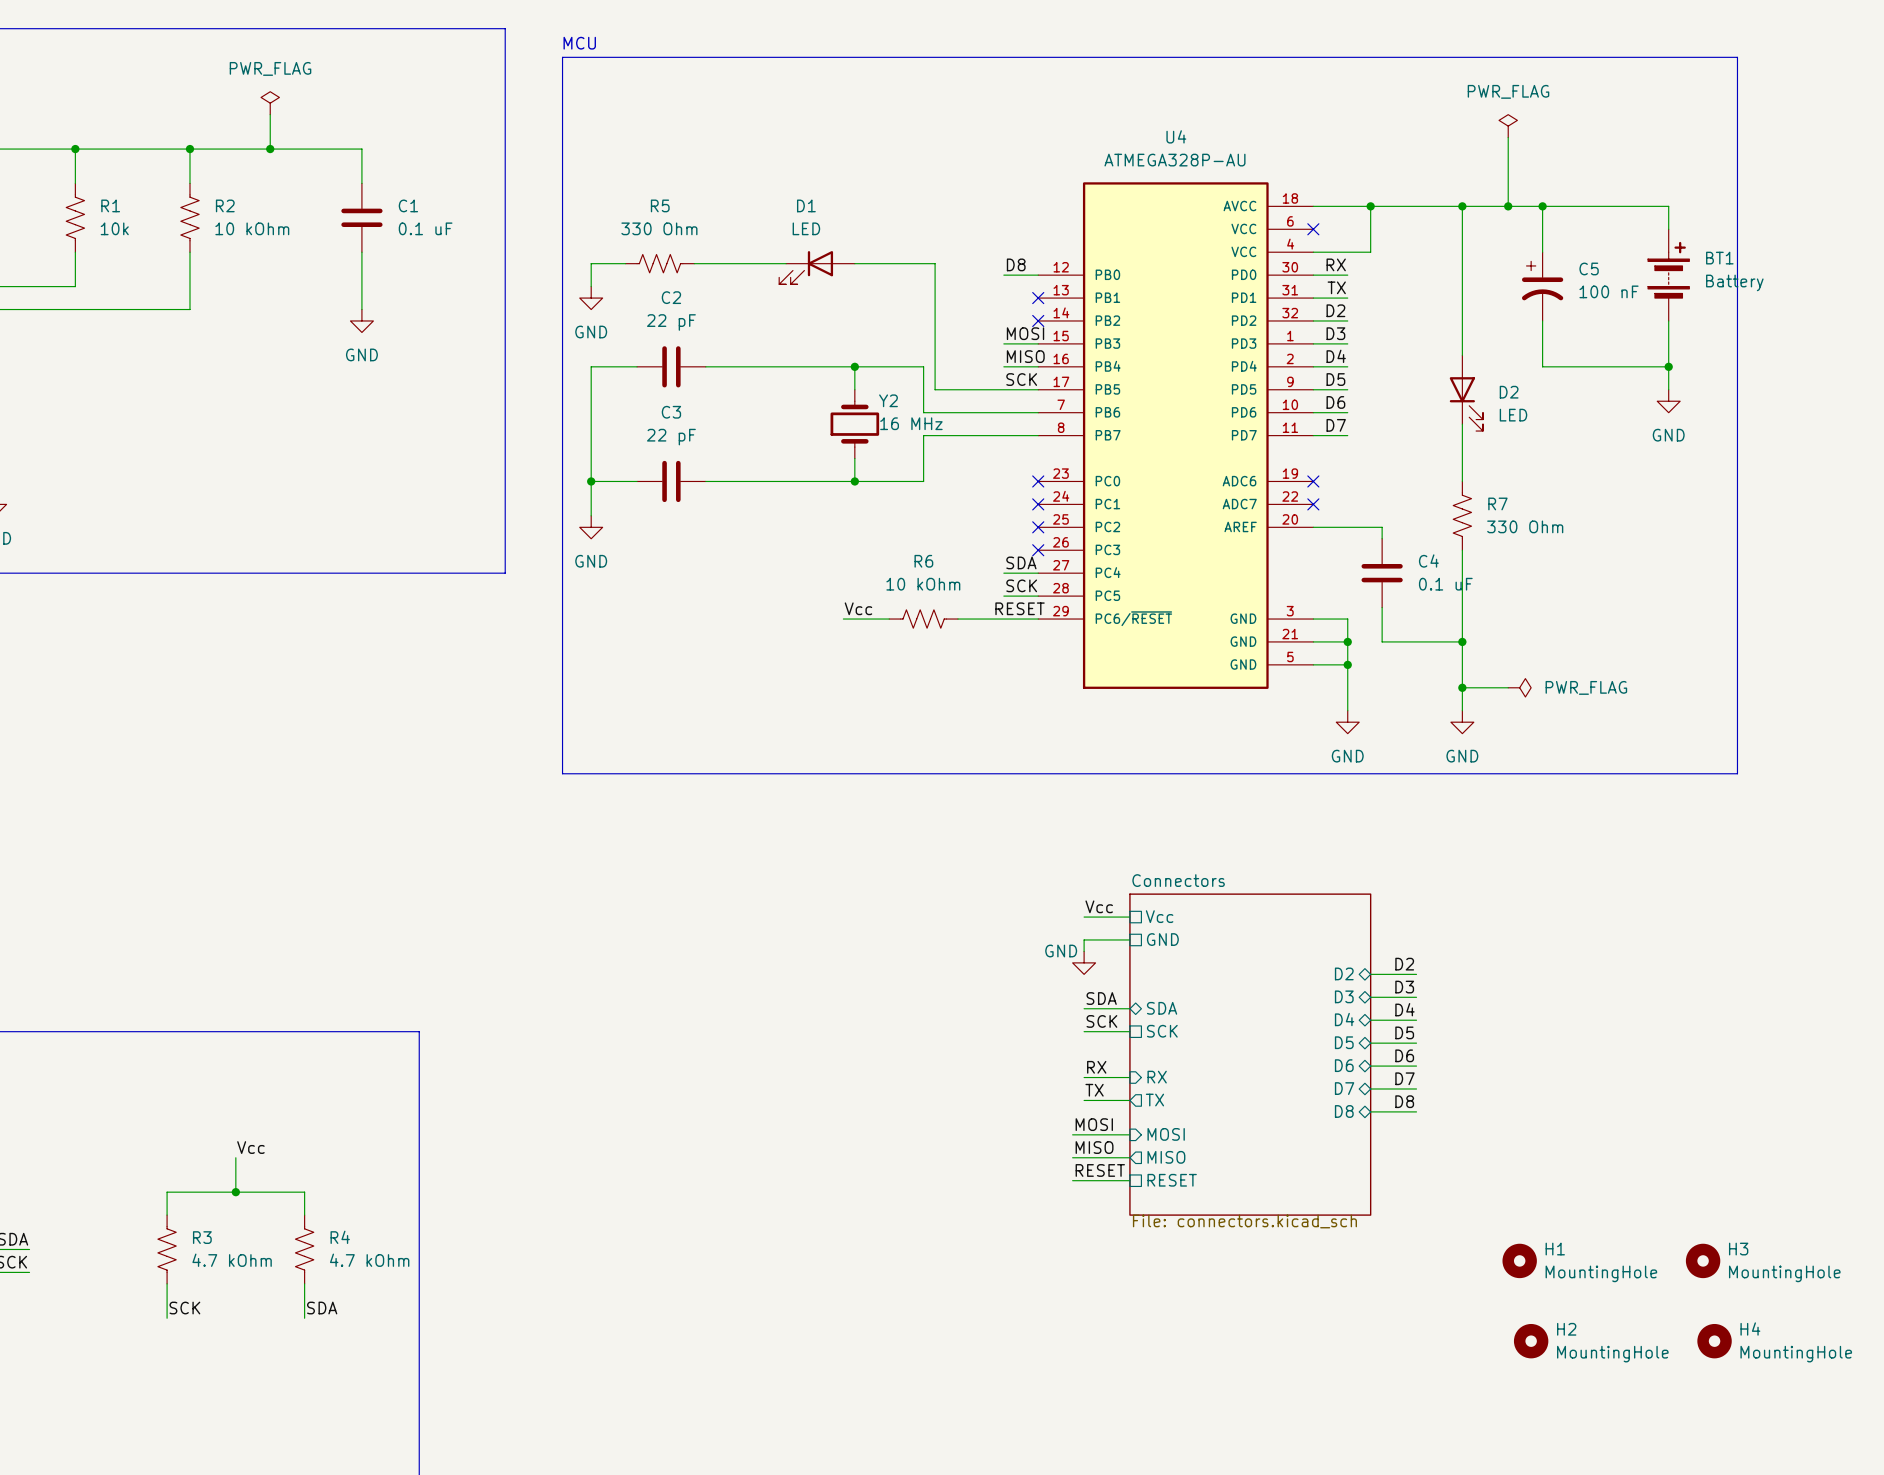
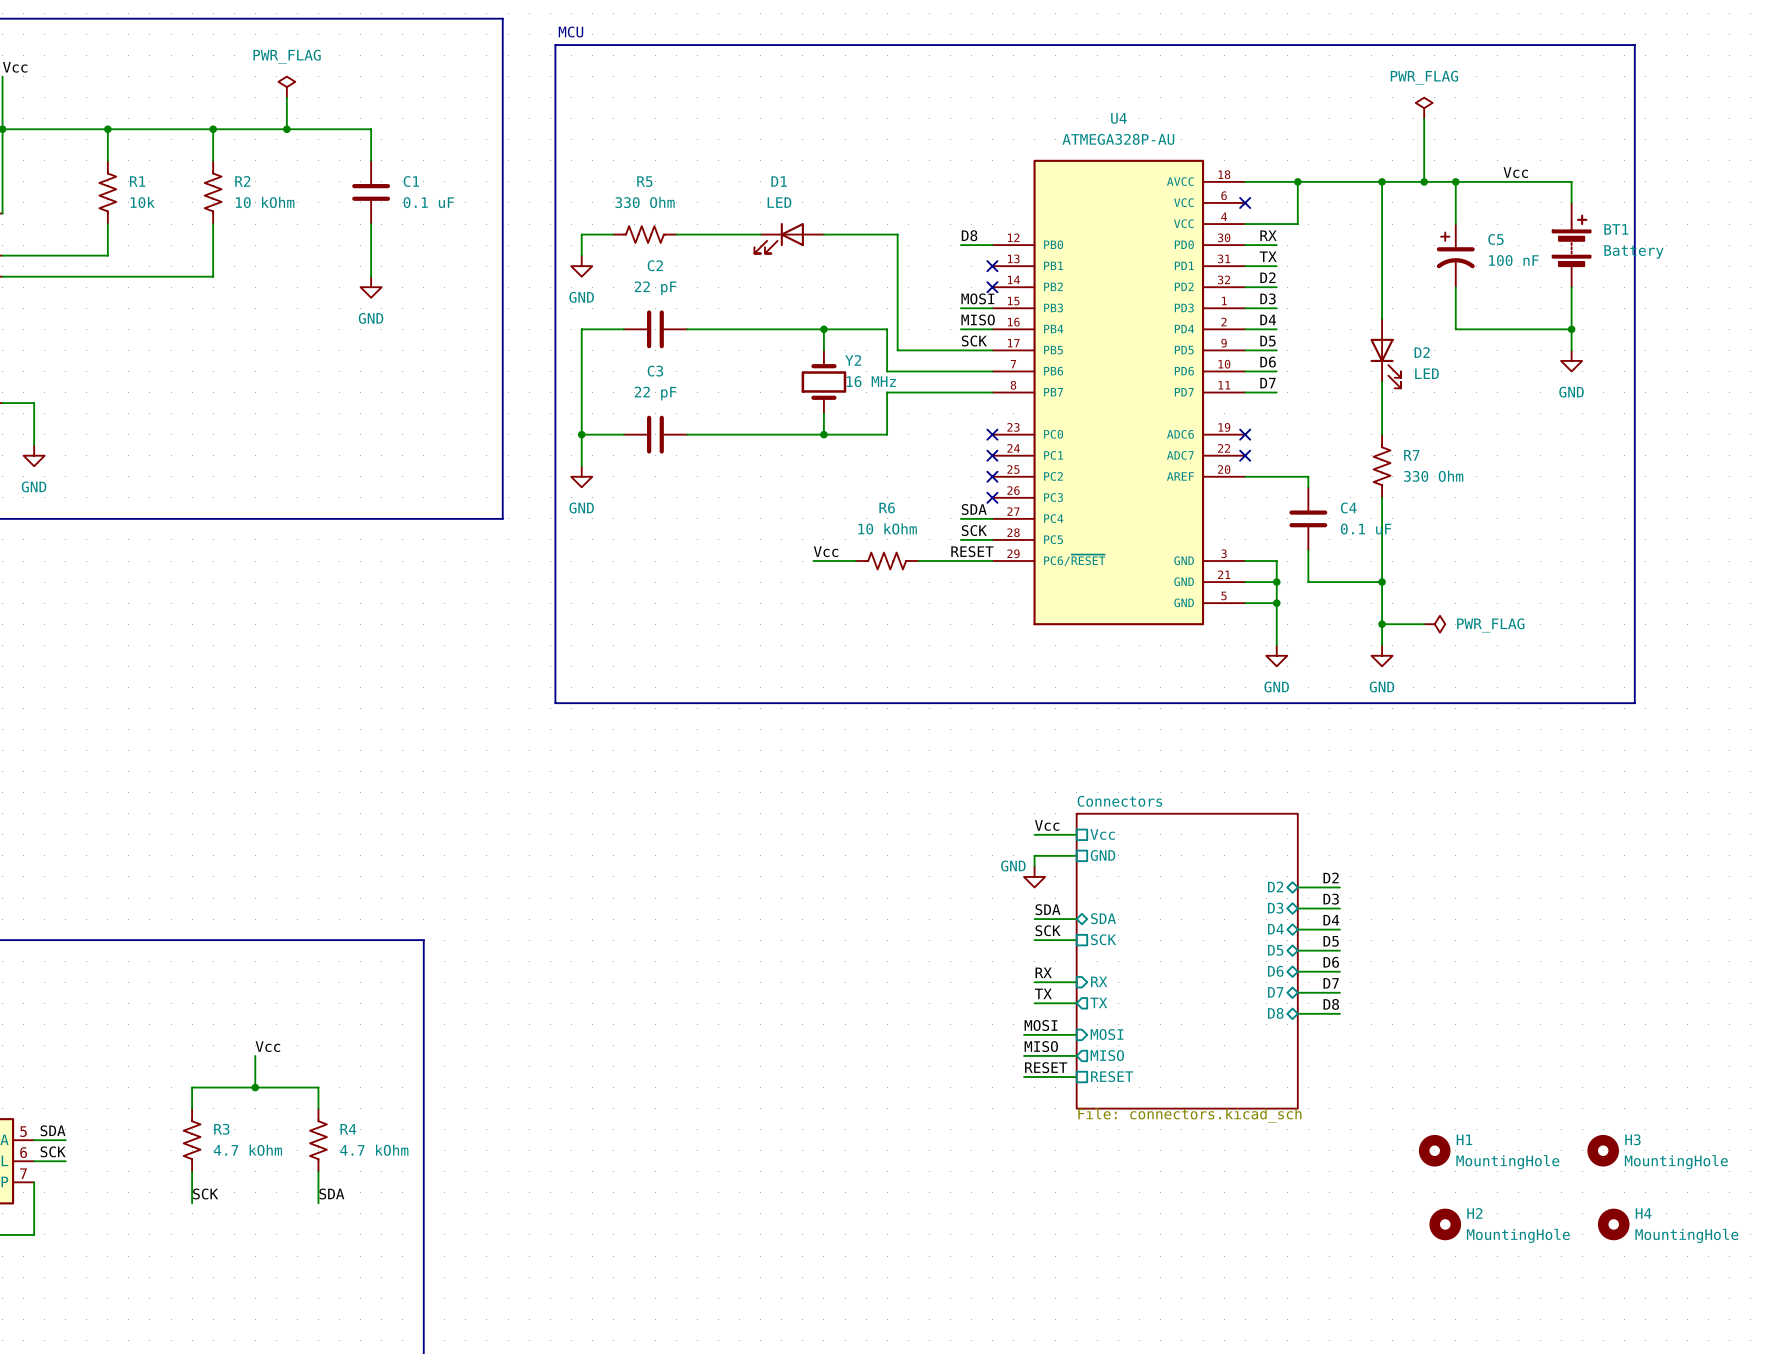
label: none -> Vcc (1515, 172)

